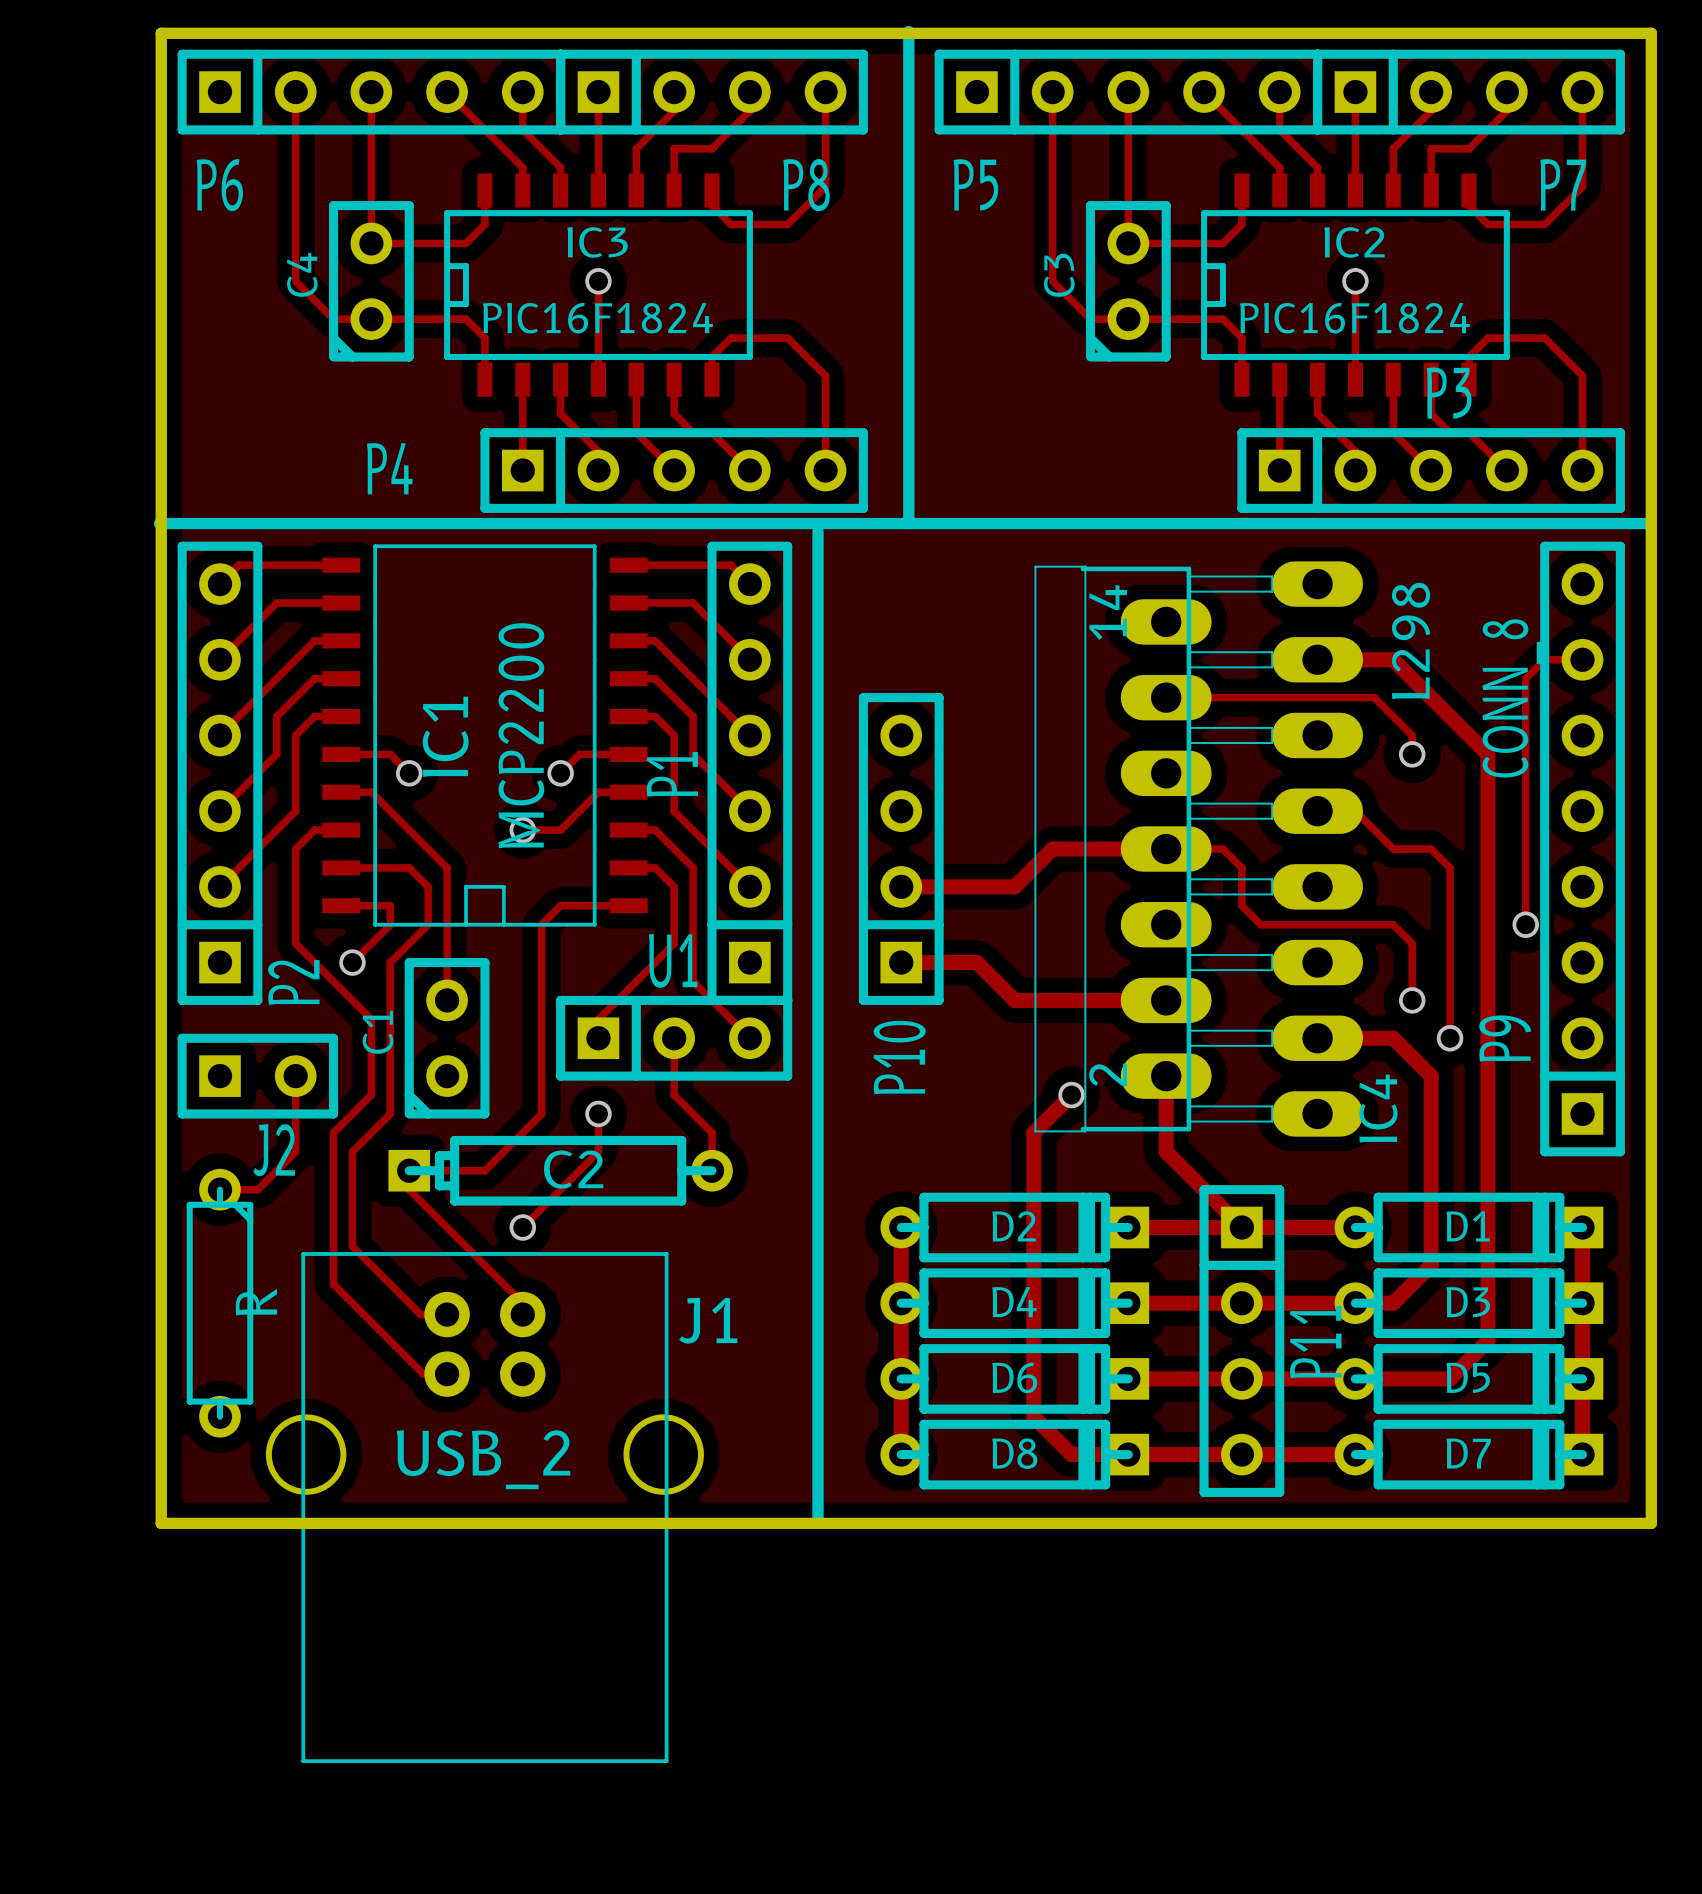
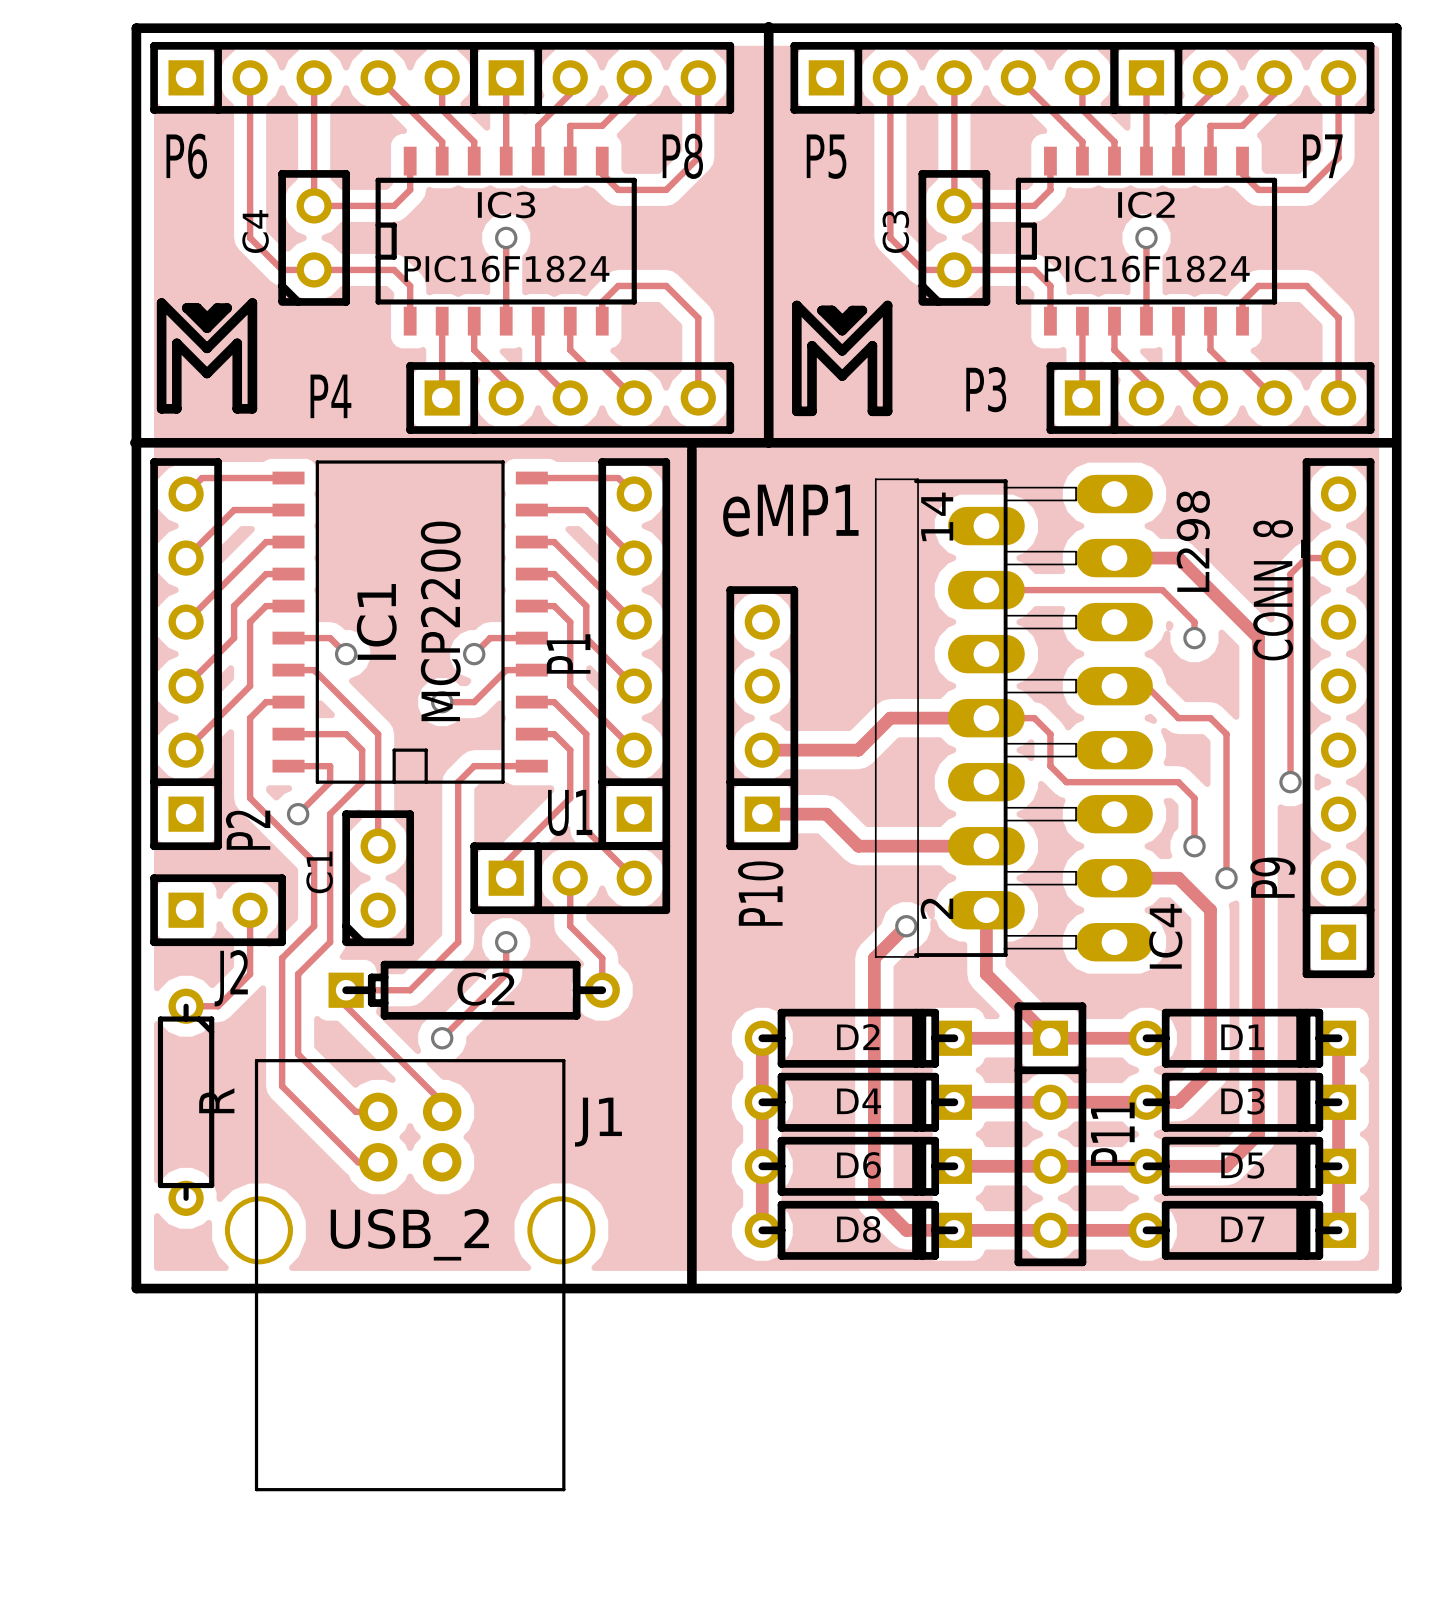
line: none -> (161, 302) (161, 408) (176, 408) (176, 343) (207, 373) (237, 343) (237, 408) (252, 408) (252, 302) (207, 348) (161, 302)
line: none -> (796, 305) (842, 350) (887, 305) (887, 411) (872, 411) (872, 345) (842, 376) (812, 345) (812, 411) (796, 411) (796, 305)
line: none -> (186, 308) (207, 328) (227, 308) (217, 308) (207, 318) (197, 308) (186, 308)
line: none -> (822, 310) (832, 310) (842, 320) (852, 310) (862, 310) (842, 330) (822, 310)
P3 name position: P3 (1449, 393) -> P3 (986, 389)
text: none -> eMP1 (790, 510)

